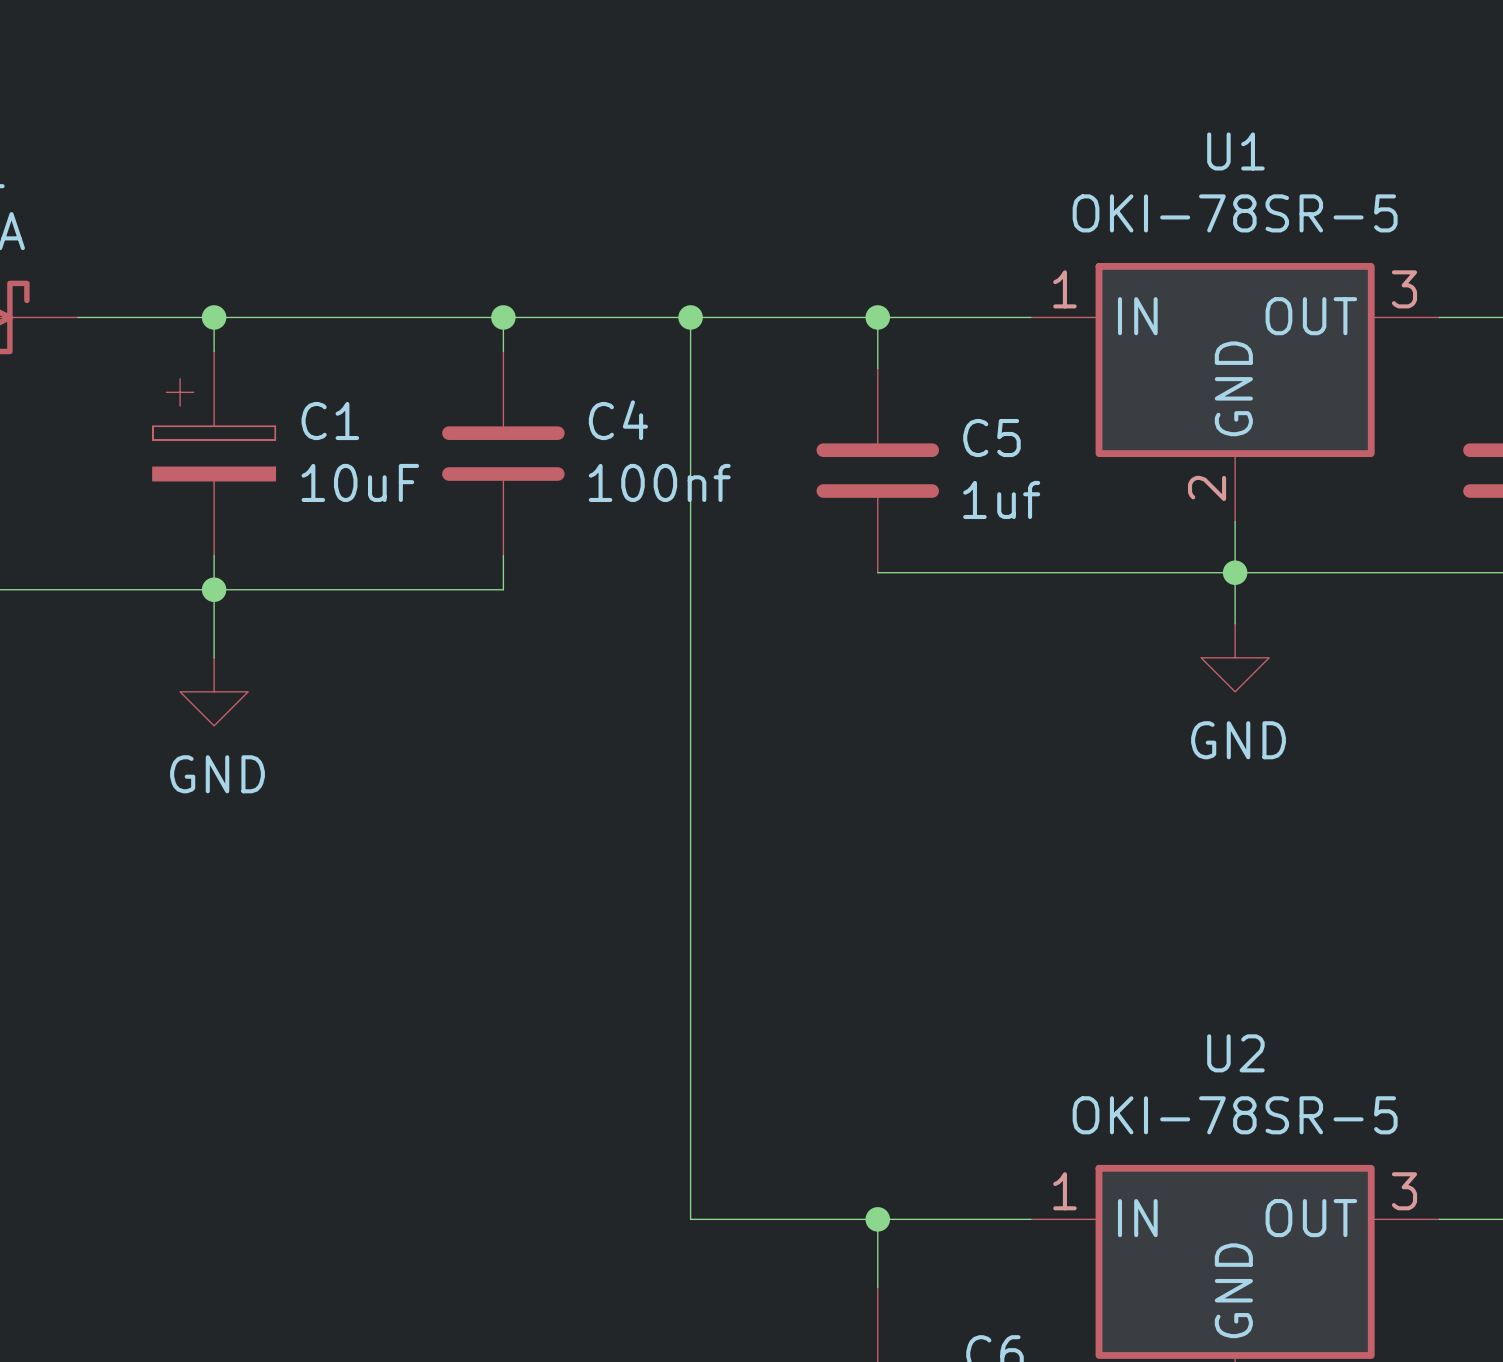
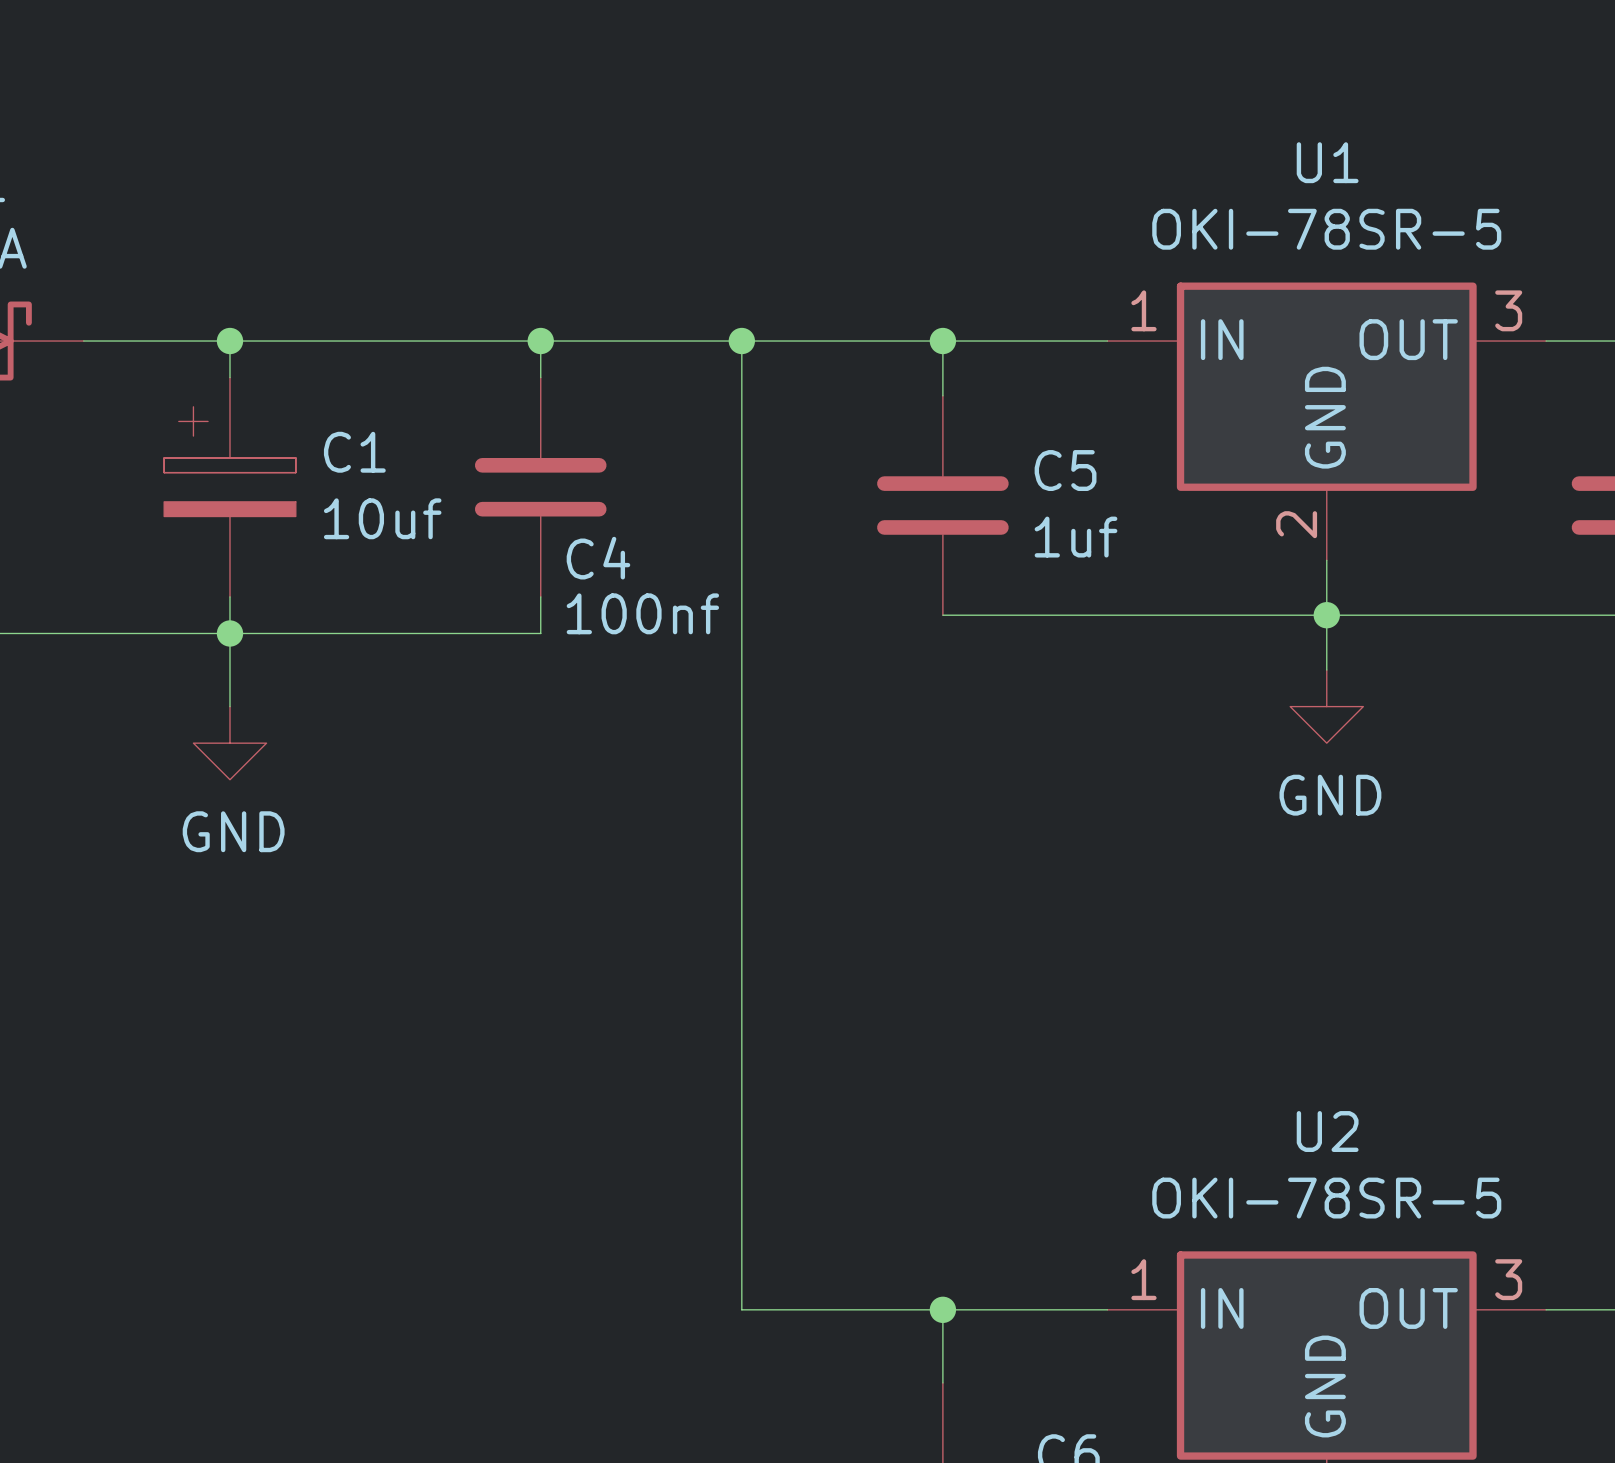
C4 name position: C4 (618, 420) -> C4 (598, 558)
C1 value: 10uF (360, 482) -> 10uf (382, 518)
C4 value position: 100nf (659, 482) -> 100nf (642, 613)

